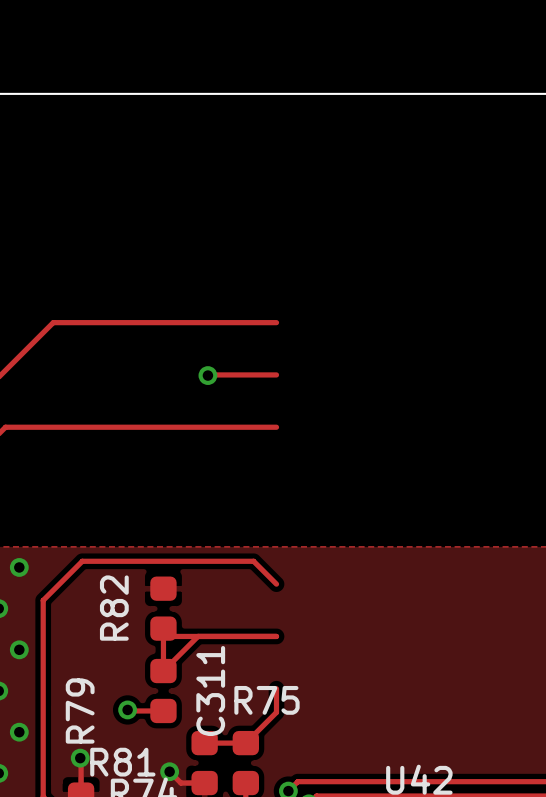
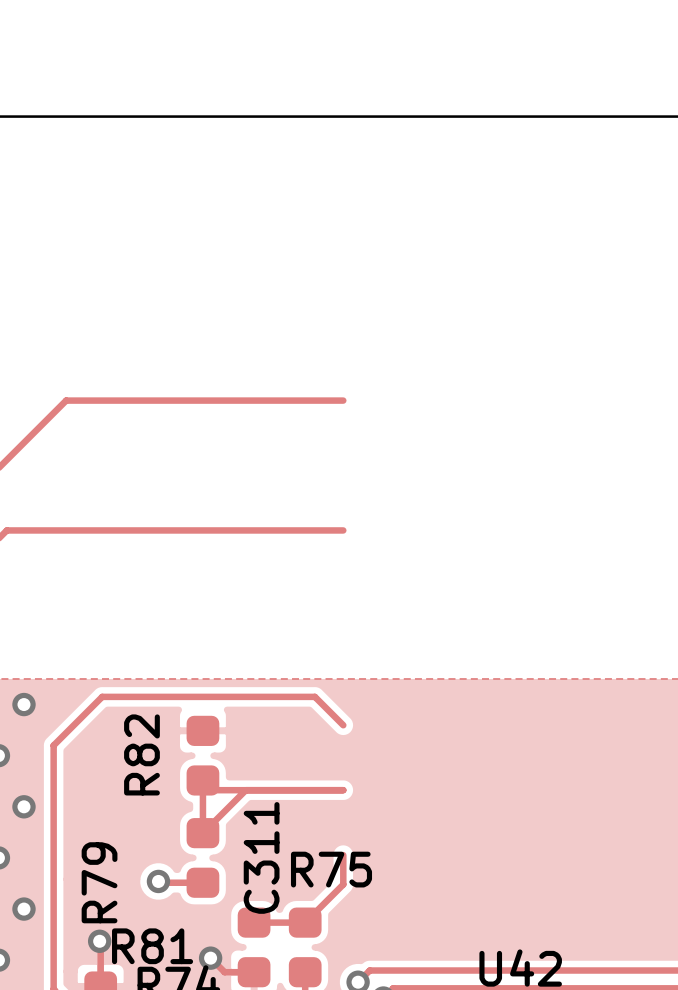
track: (276, 374) (207, 375) -> none
via: (207, 375) -> none

